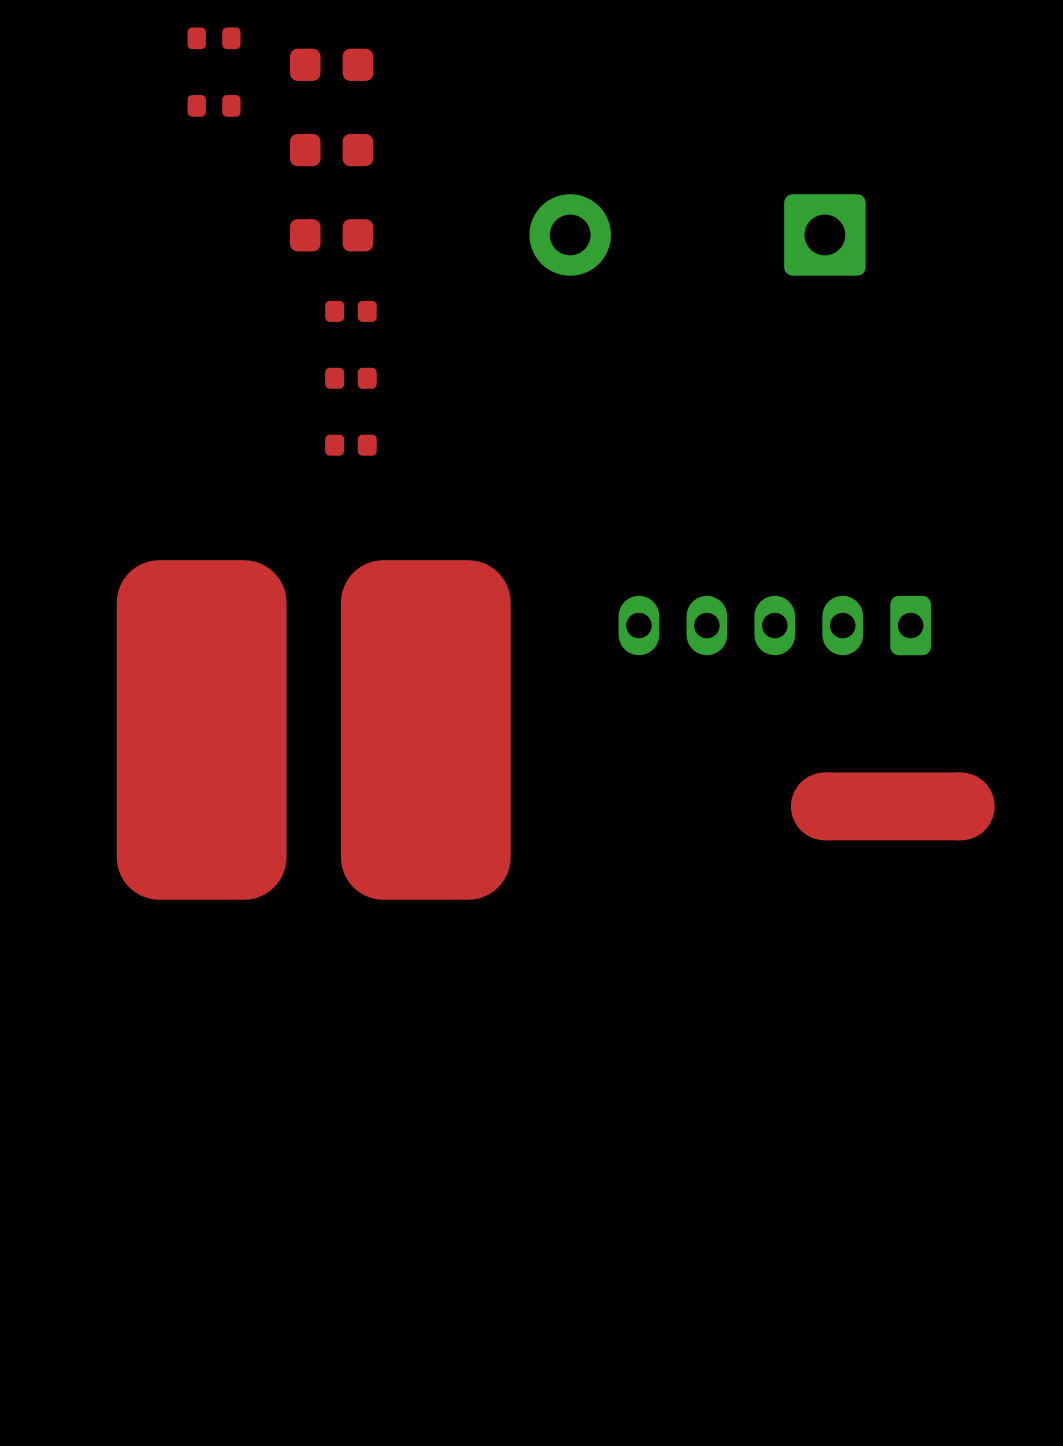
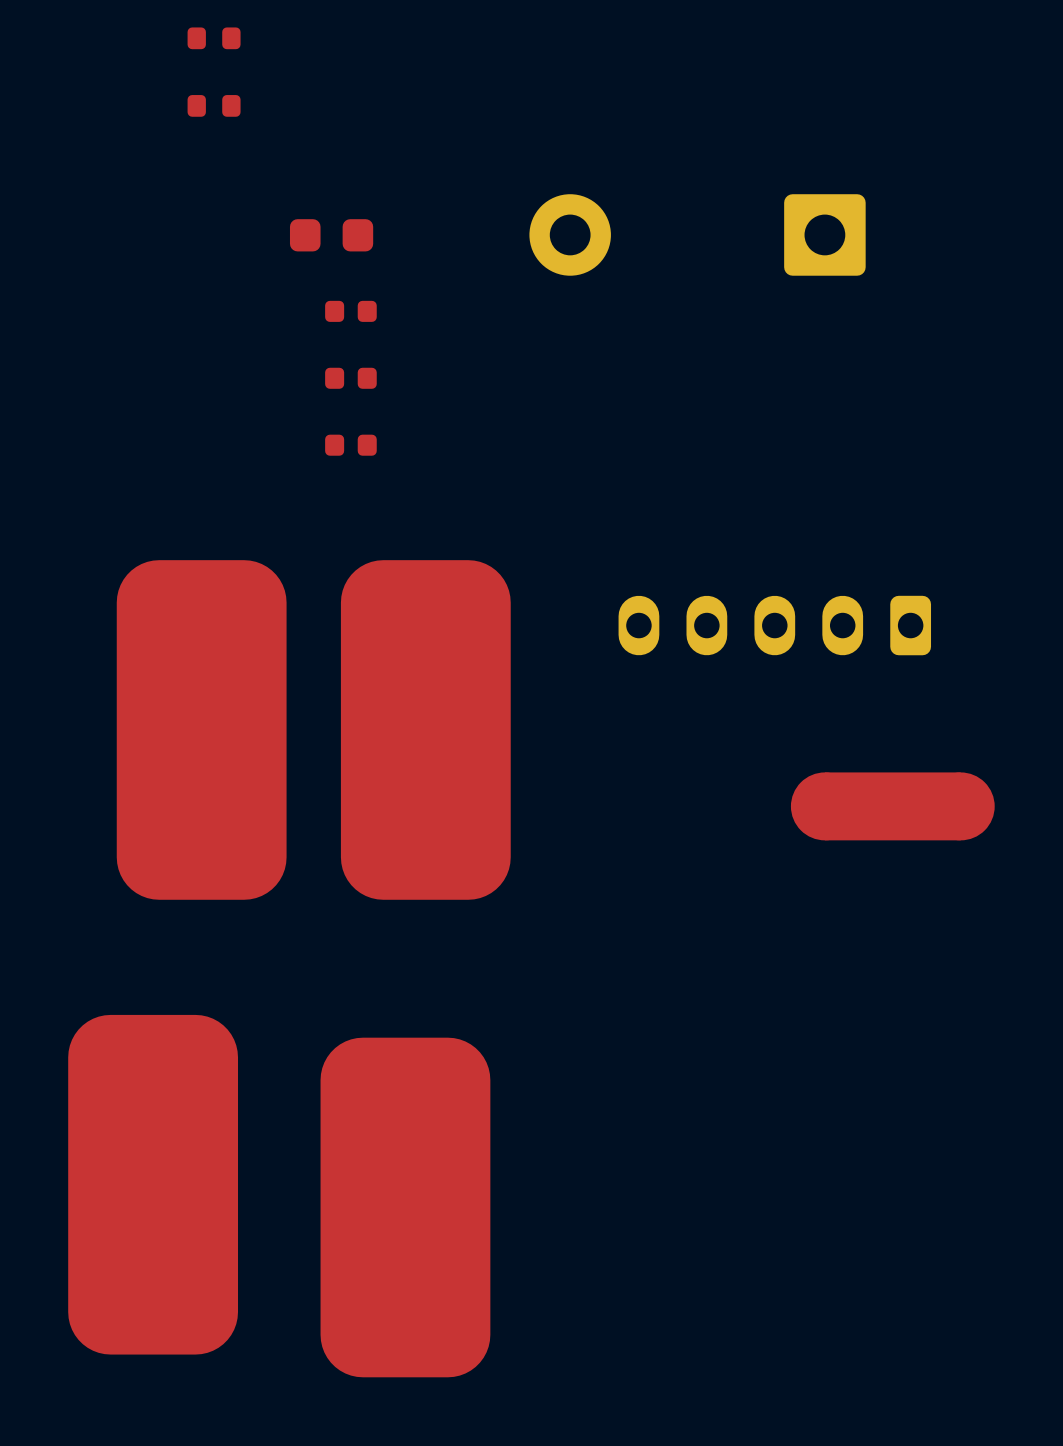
part: (331, 64) -> none
part: (331, 150) -> none
part: none -> (153, 1184)
part: none -> (405, 1207)

